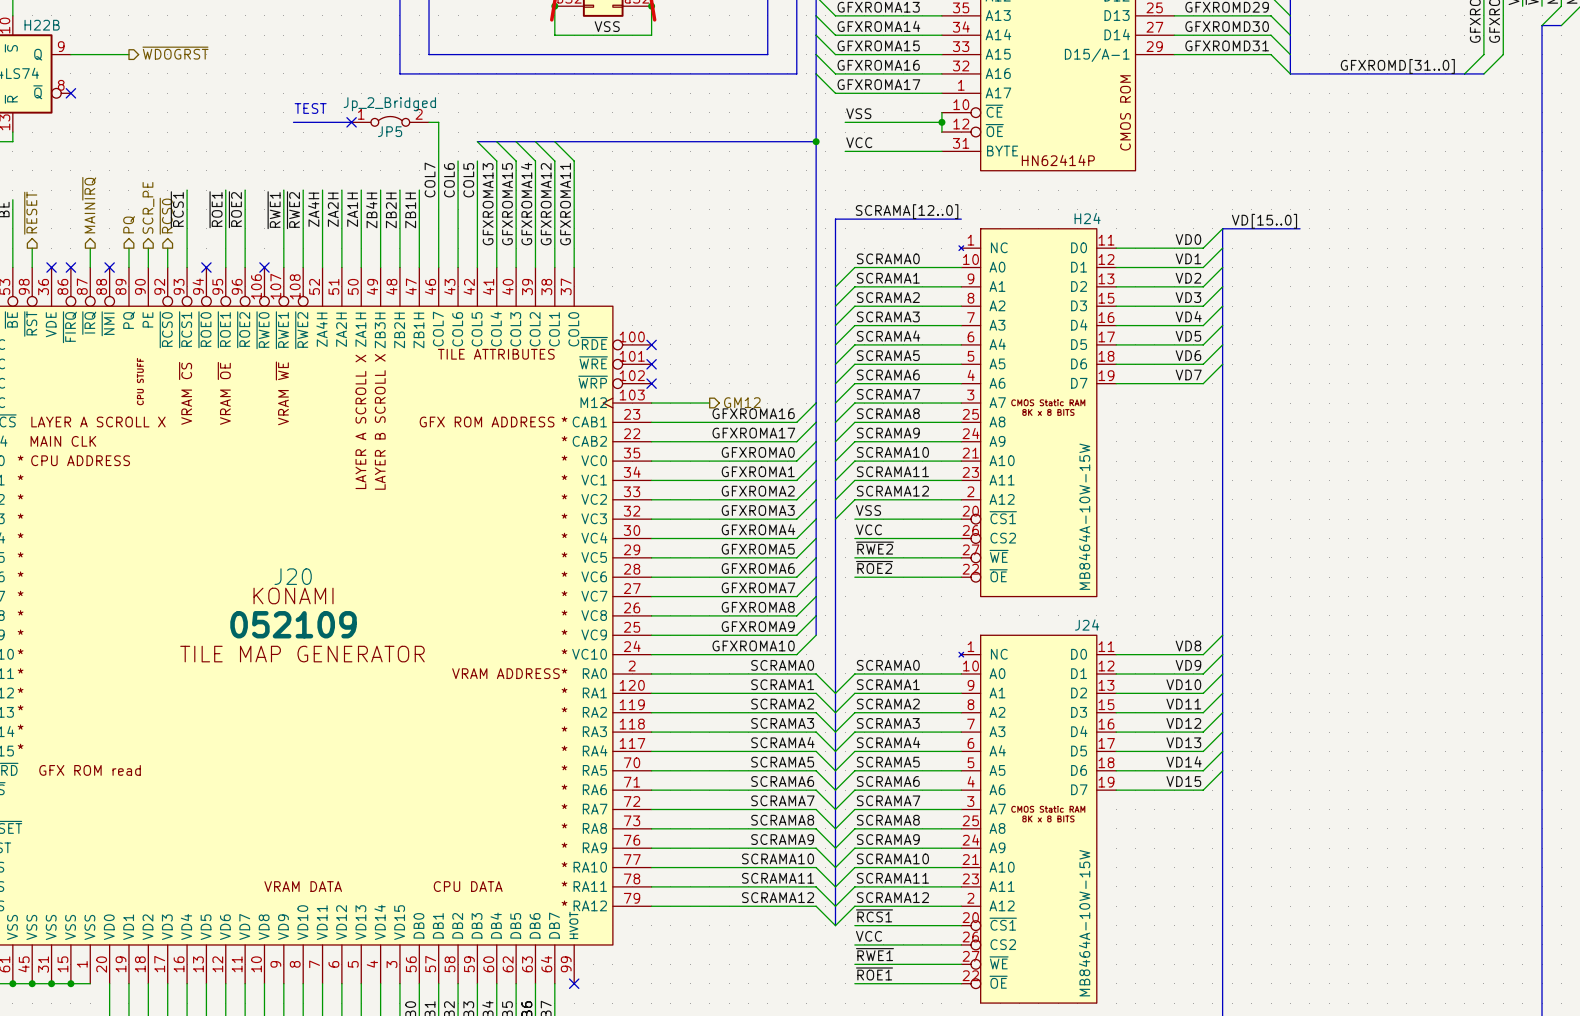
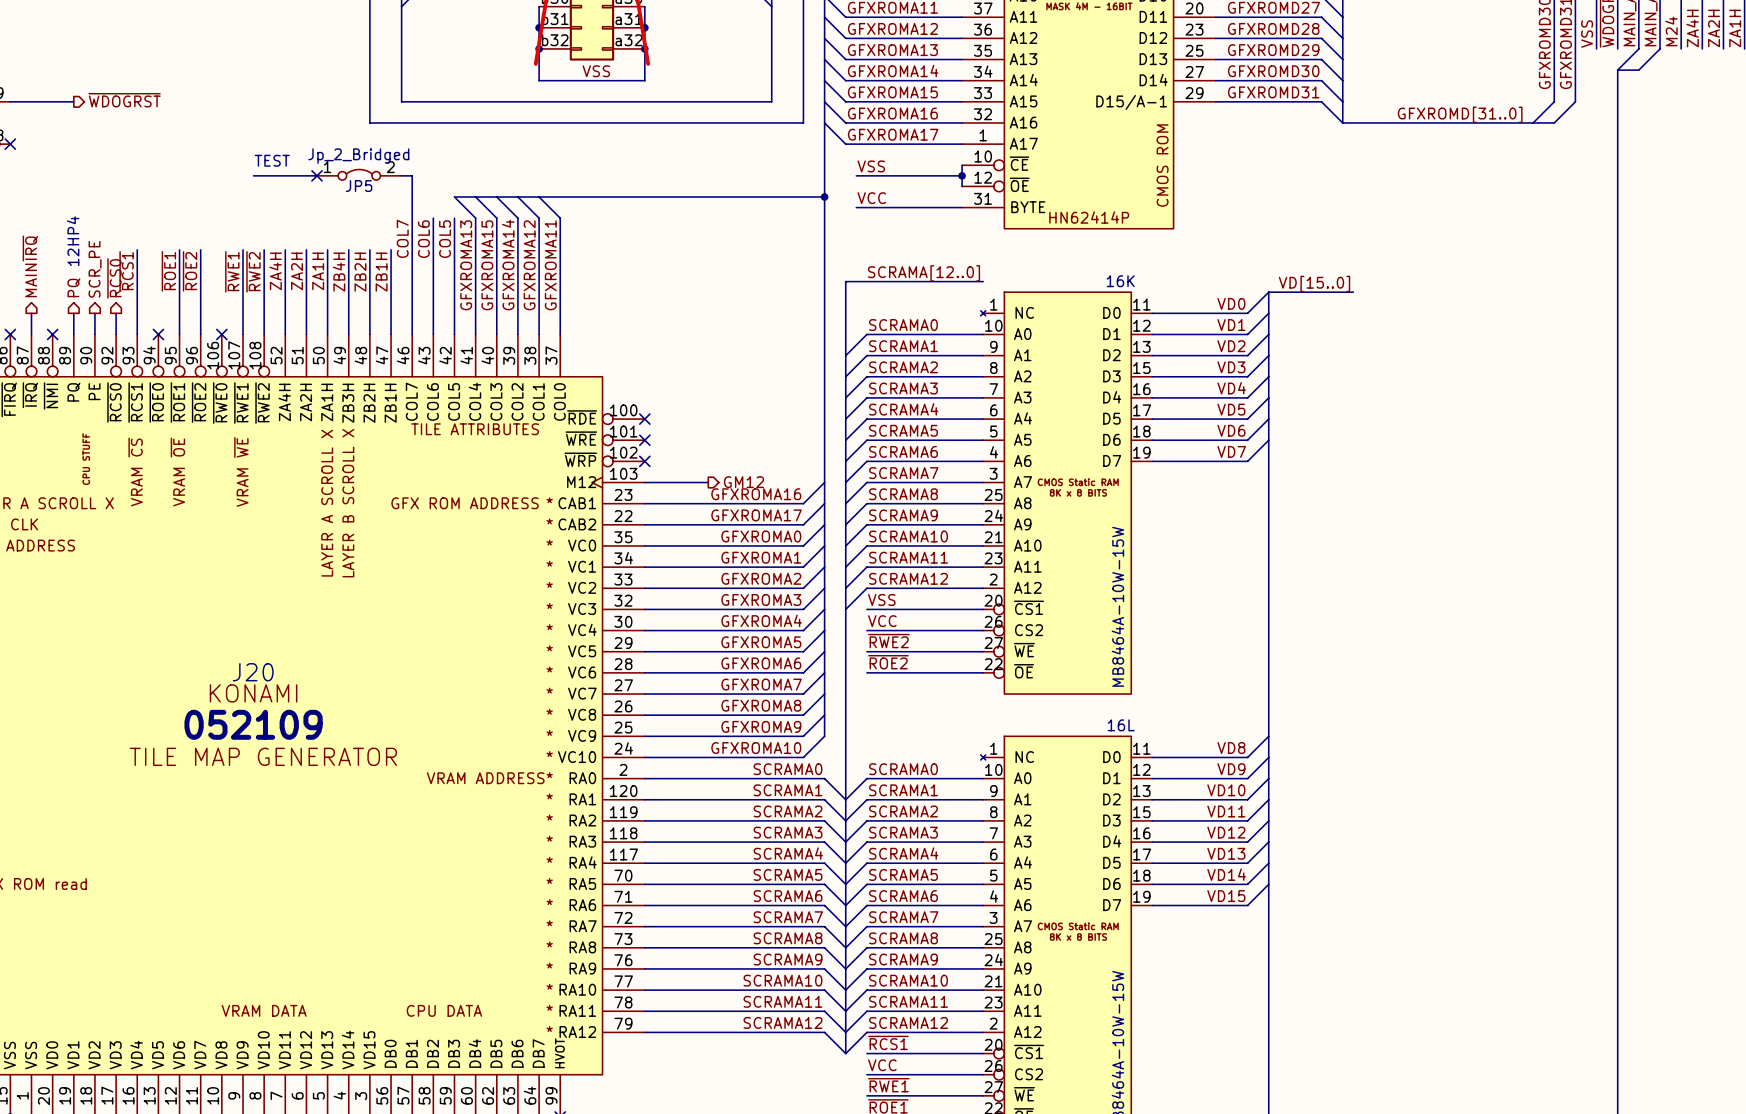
text: none -> 12HP4 (73, 241)
H24 name: H24 (1087, 218) -> 16K (1120, 281)
J24 name: J24 (1087, 625) -> 16L (1121, 725)

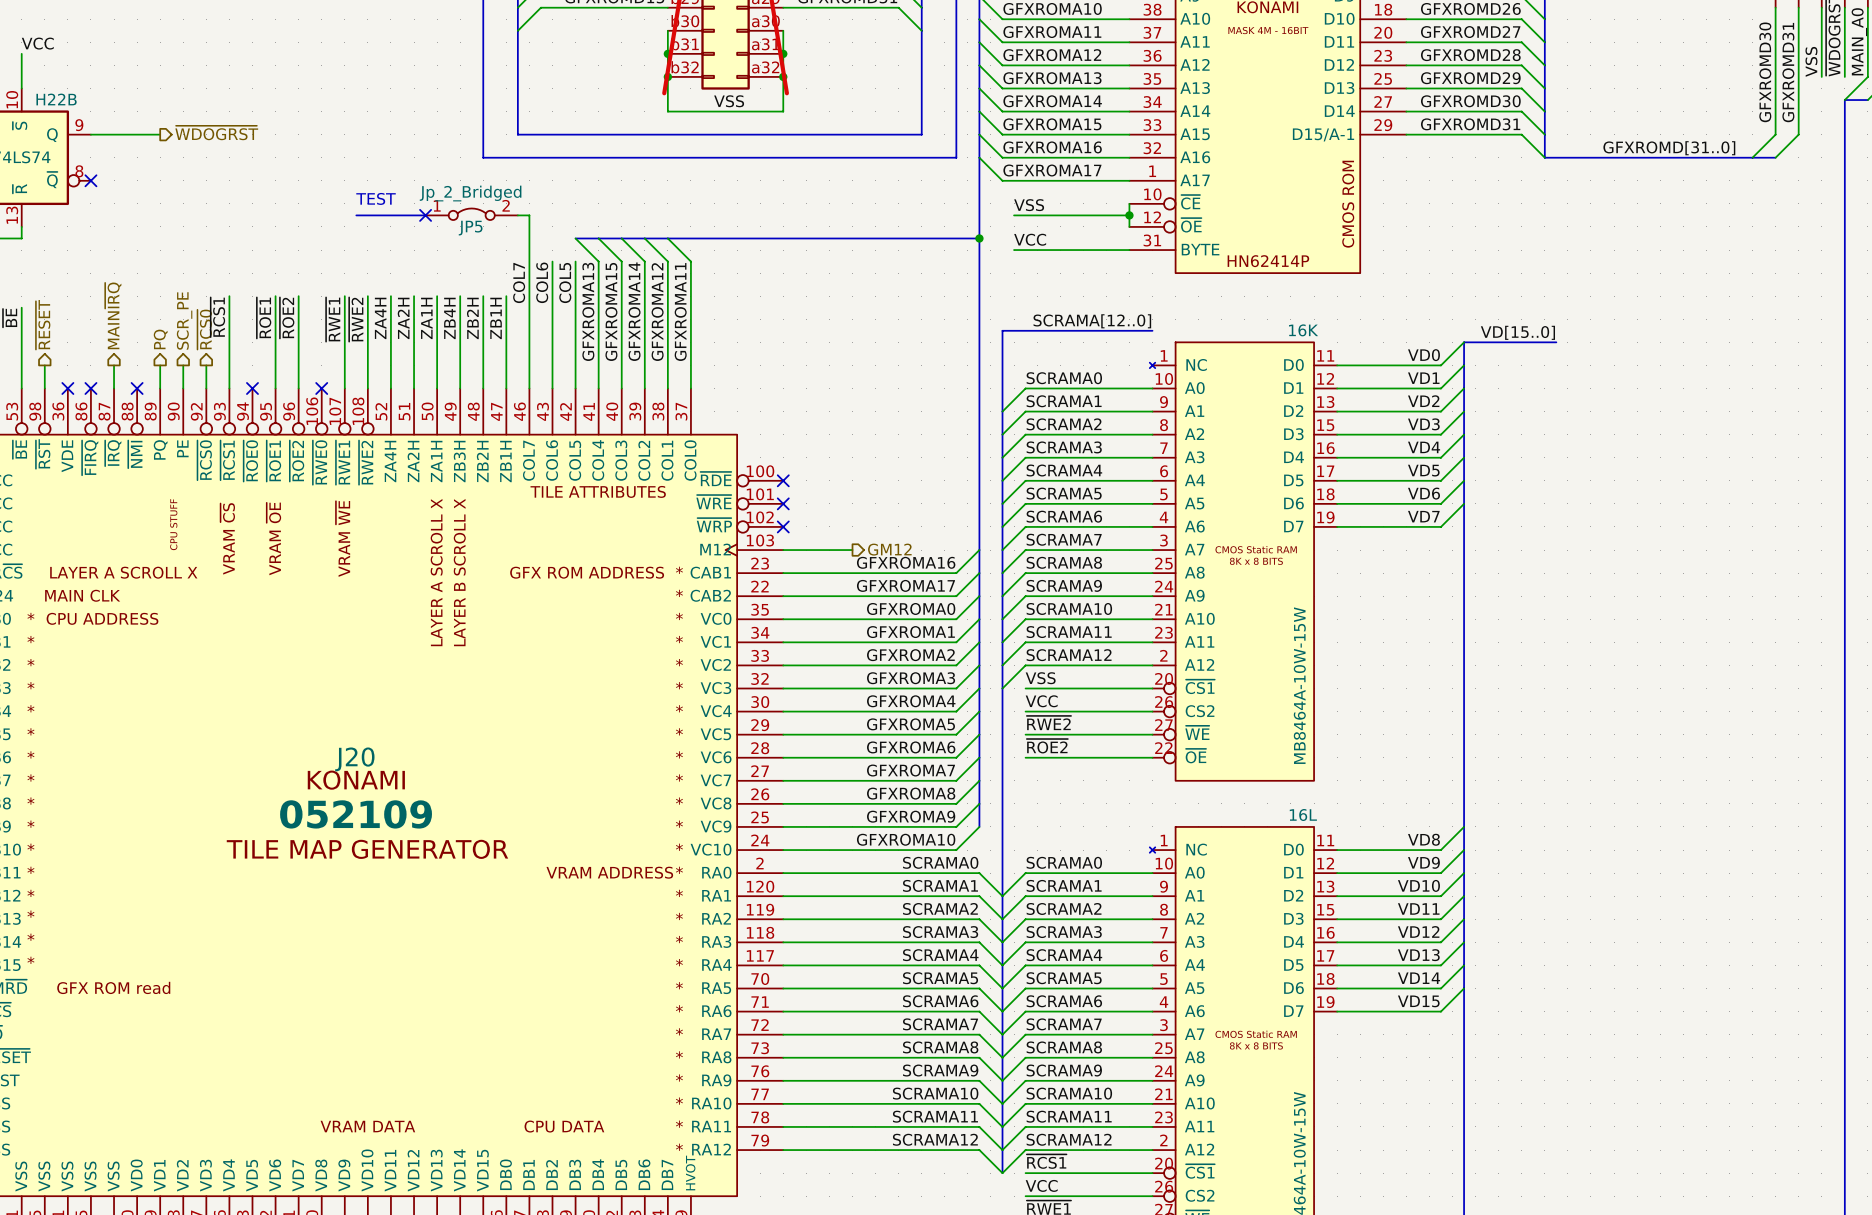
text: 12HP4 (73, 241) -> none

